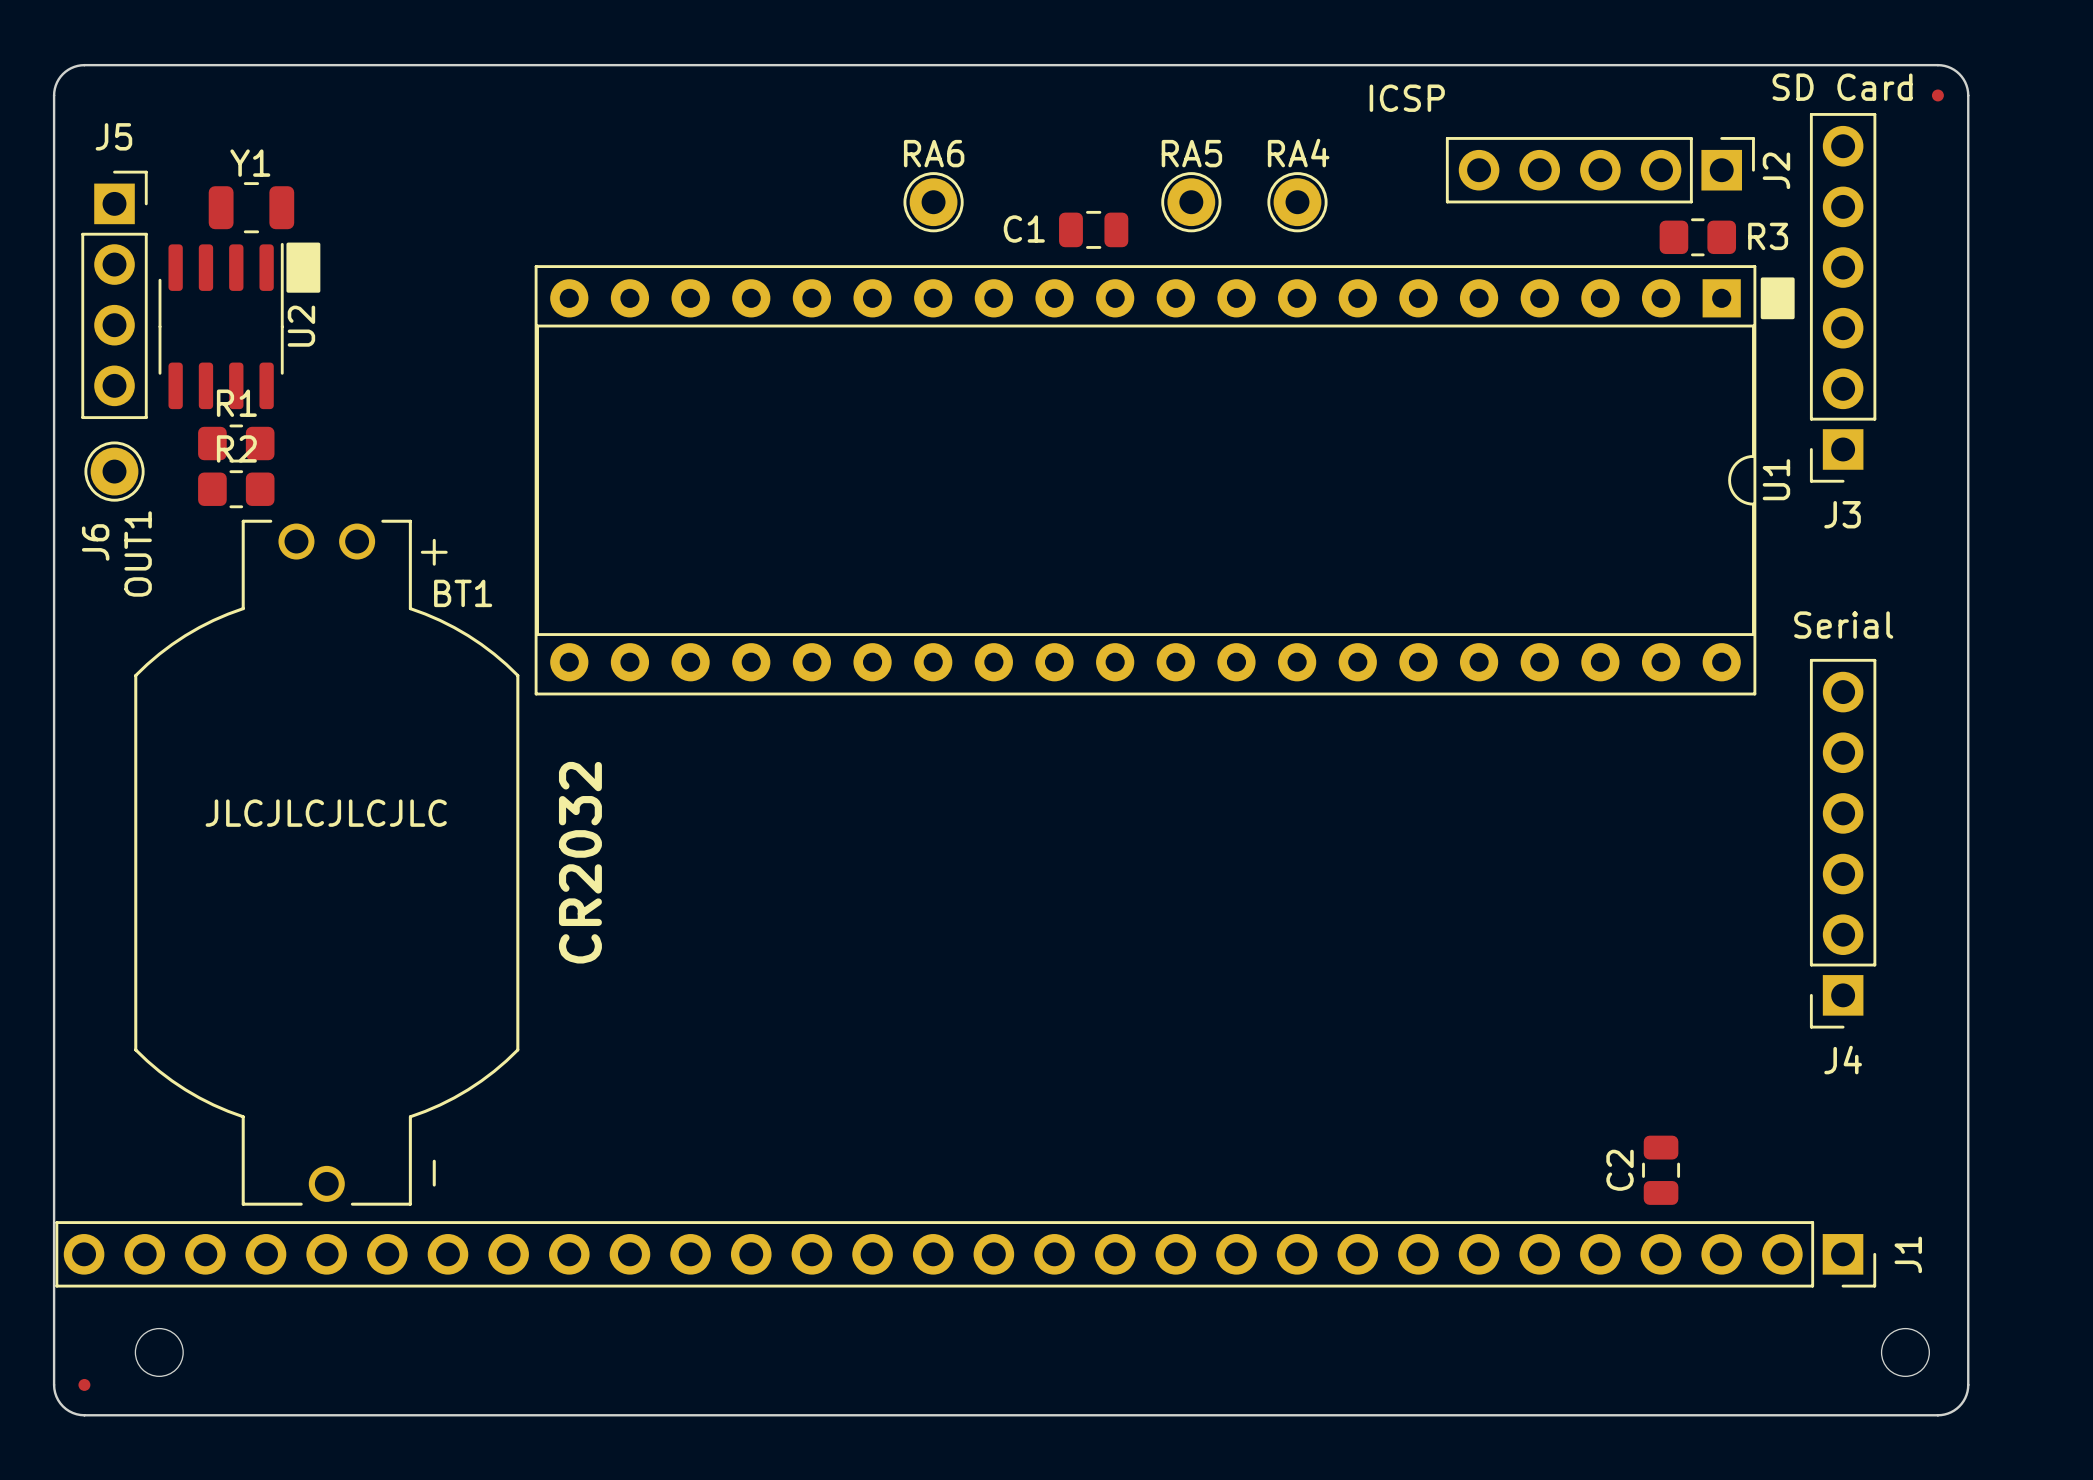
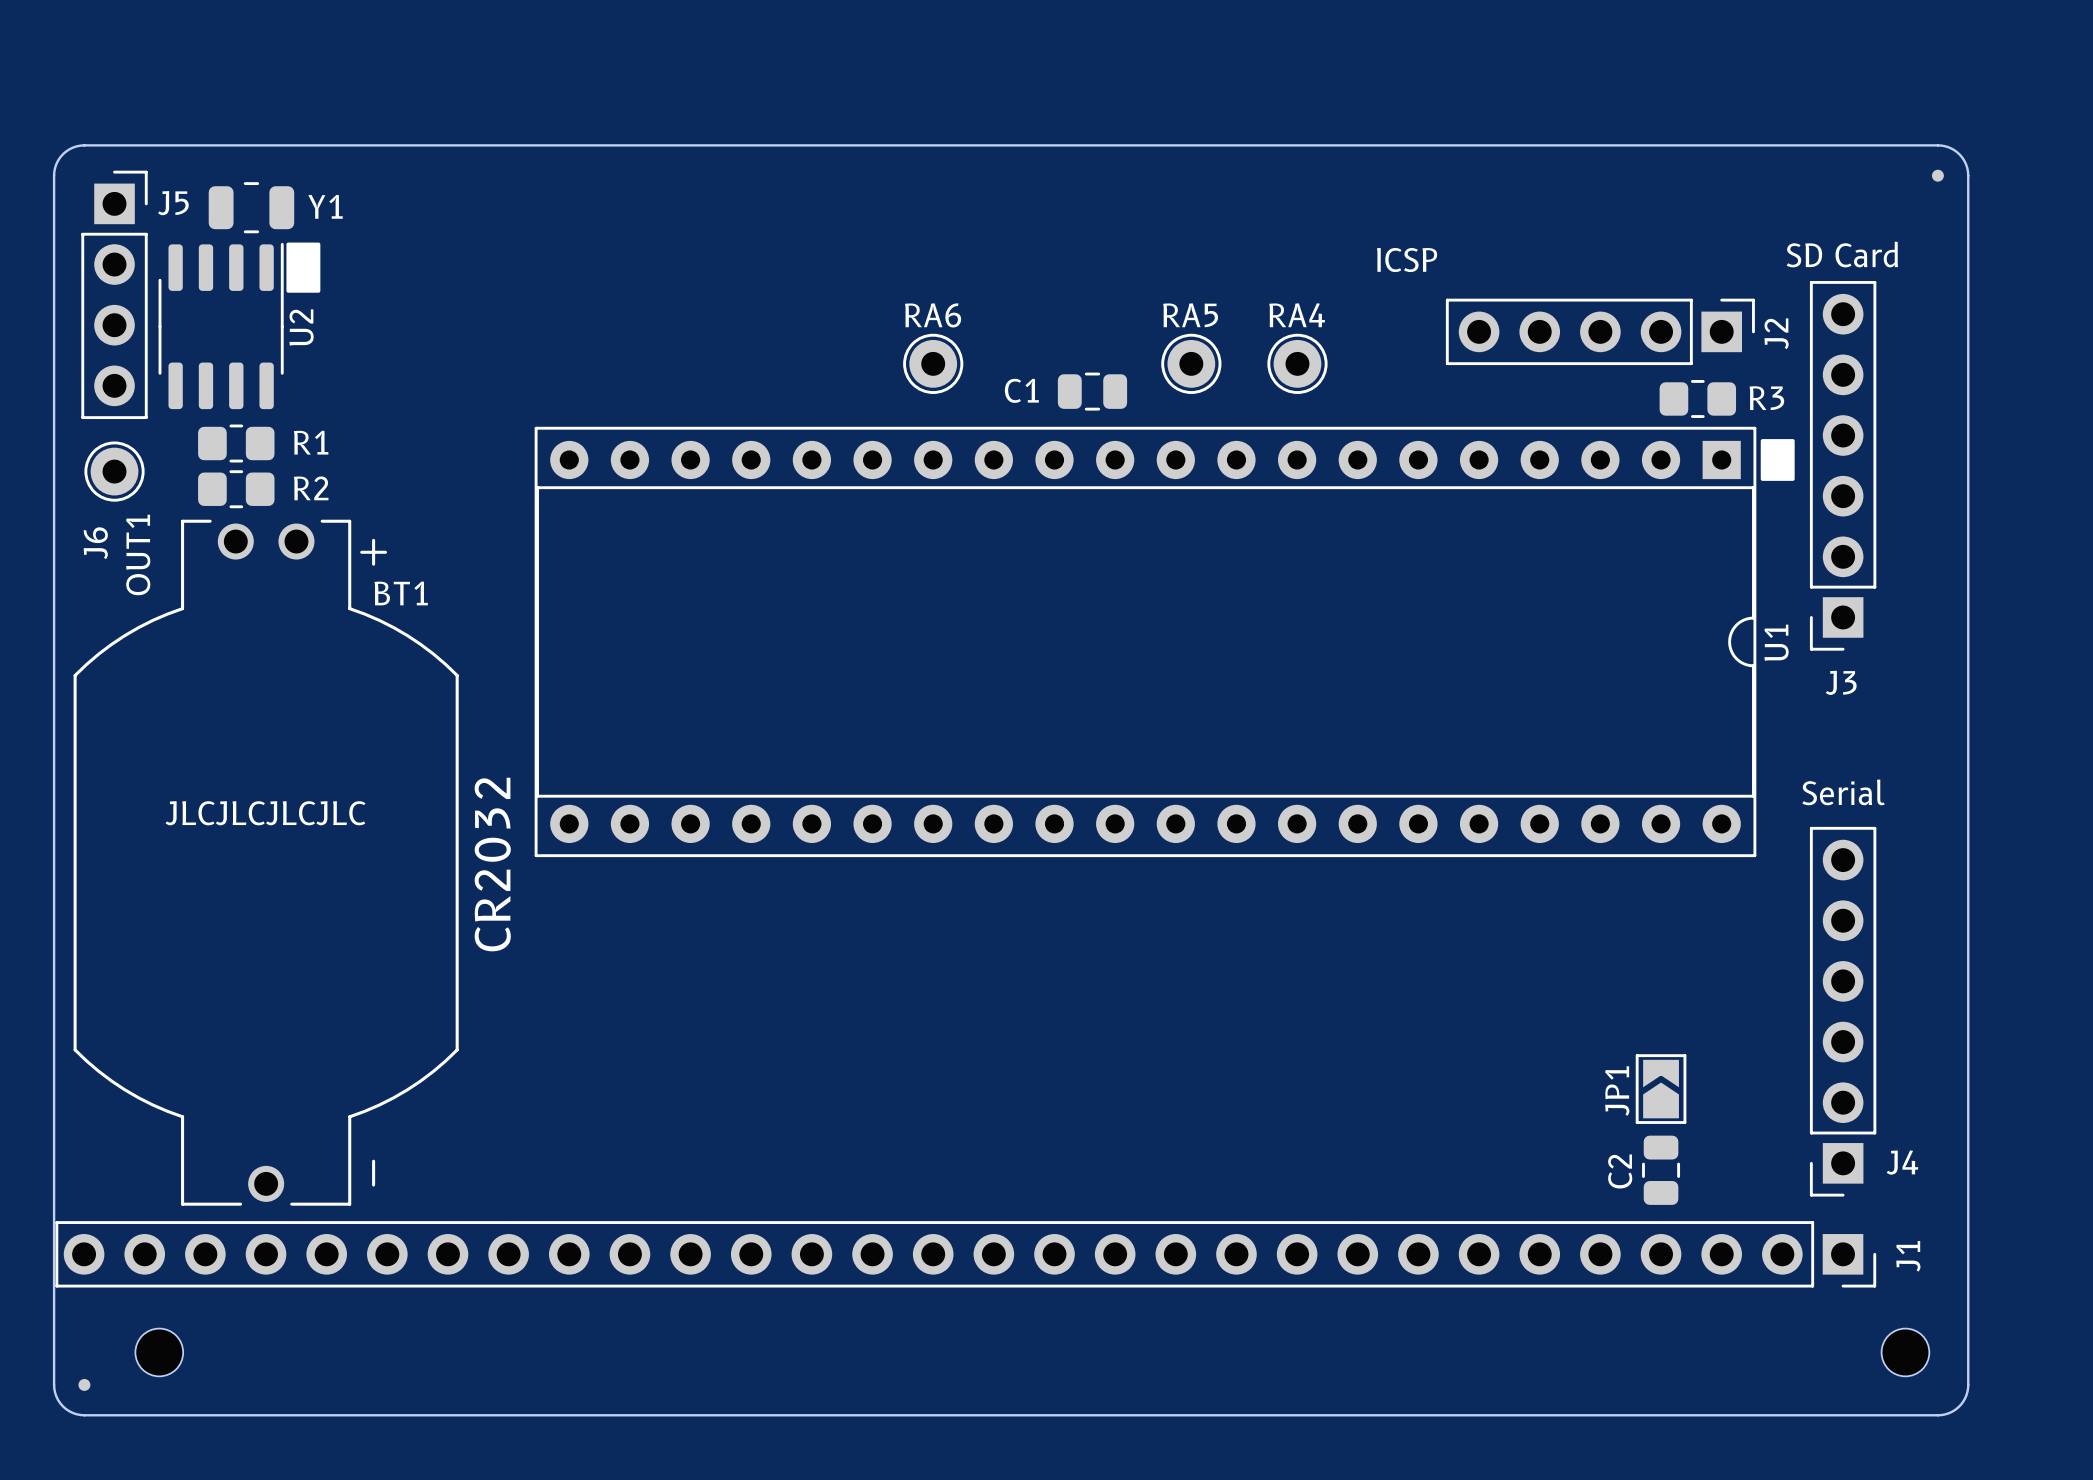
part position: (1937, 95) -> (1937, 175)
J5 name position: J5 (113, 136) -> J5 (173, 203)
Y1 name position: Y1 (250, 163) -> Y1 (325, 206)
J2 position: (1600, 170) -> (1600, 331)
board edge: (54, 175) (54, 88) (58, 79) (65, 71) (74, 66) (84, 65) (1941, 65) (1951, 68) (1959, 74) (1967, 88) (1968, 175) -> (54, 175) (57, 162) (62, 154) (71, 148) (84, 145) (1937, 145) (1947, 147) (1959, 154) (1966, 165) (1968, 175)
RA6 position: (933, 202) -> (933, 363)
RA5 position: (1191, 202) -> (1191, 363)
RA4 position: (1297, 202) -> (1297, 363)
C1 position: (1093, 229) -> (1092, 391)
R3 position: (1697, 237) -> (1697, 398)
J3 position: (1843, 297) -> (1843, 465)
drawing position: (1777, 298) -> (1777, 459)
R1 name position: R1 (236, 403) -> R1 (311, 442)
R2 name position: R2 (236, 448) -> R2 (311, 488)
U1 position: (1145, 480) -> (1145, 641)
text position: JLCJLCJLCJLC (326, 813) -> JLCJLCJLCJLC (265, 813)
J4 position: (1843, 843) -> (1843, 1011)
BT1 position: (326, 862) -> (266, 862)
text position: CR2032 (580, 862) -> CR2032 (492, 864)
J4 name position: J4 (1843, 1060) -> J4 (1902, 1162)
JP1: none -> (1661, 1089)

